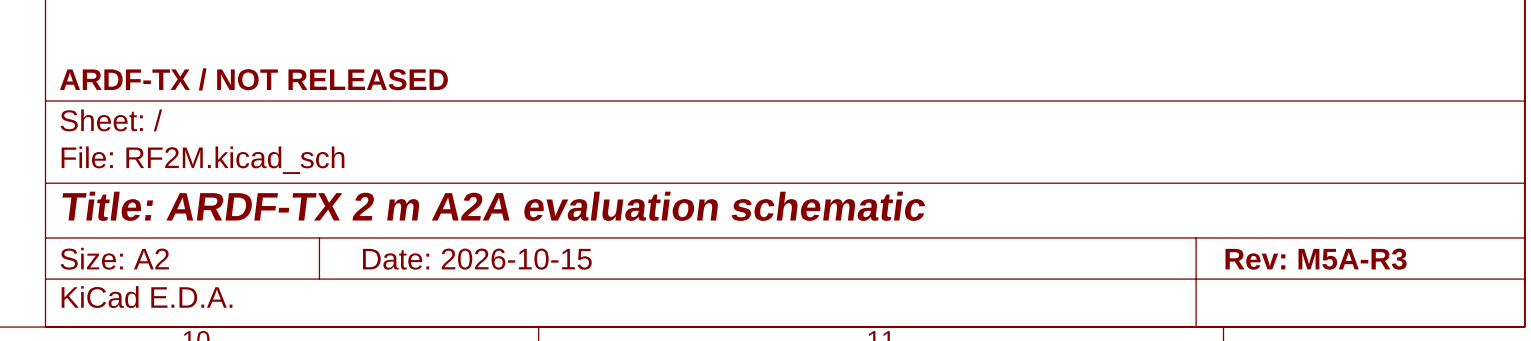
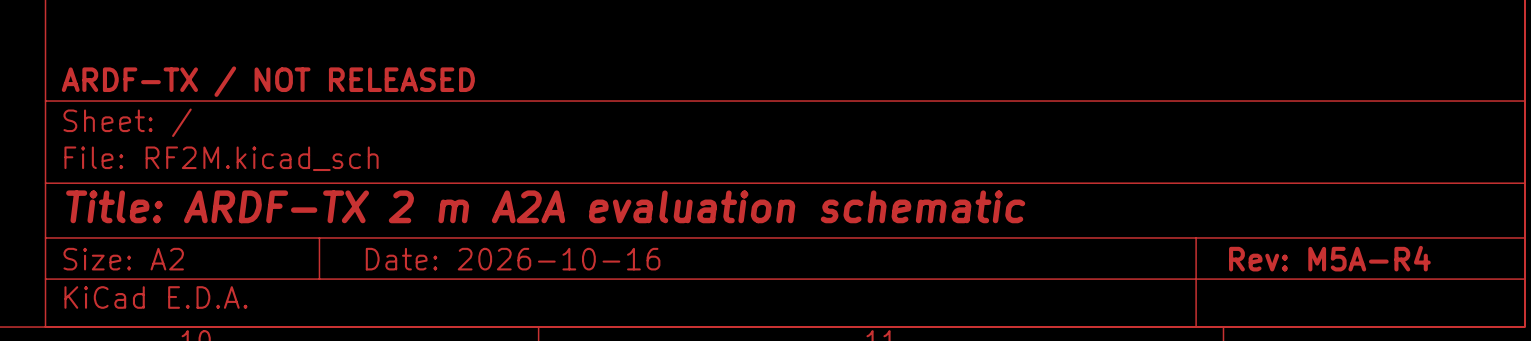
title block: Date: 2026-10-15 (477, 259) -> Date: 2026-10-16 (513, 259)
title block: Rev: M5A-R3 (1316, 259) -> Rev: M5A-R4 (1329, 258)

